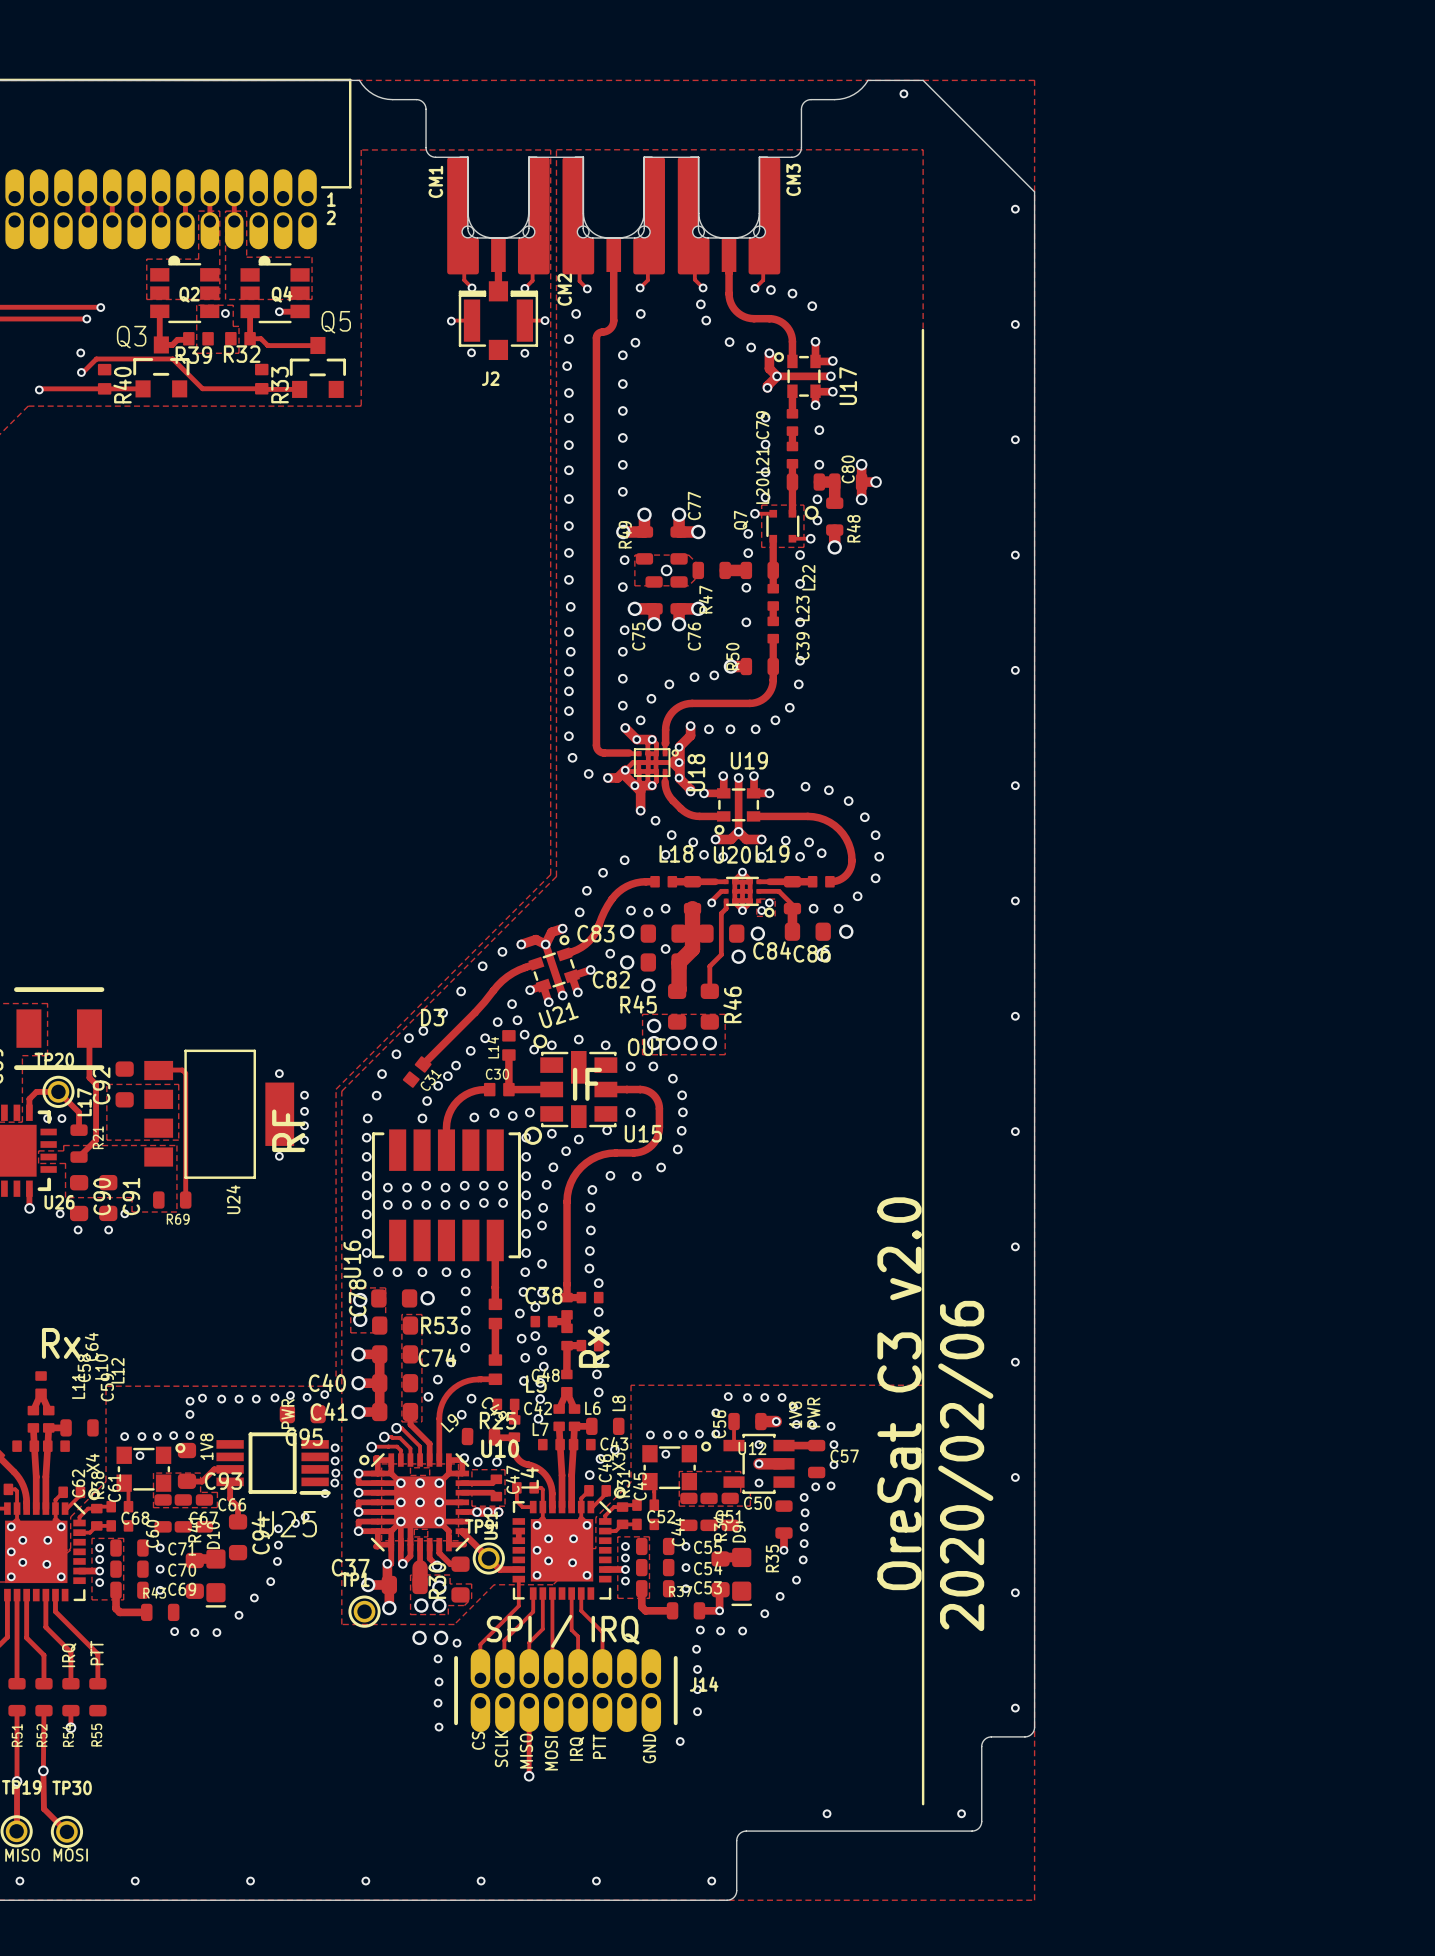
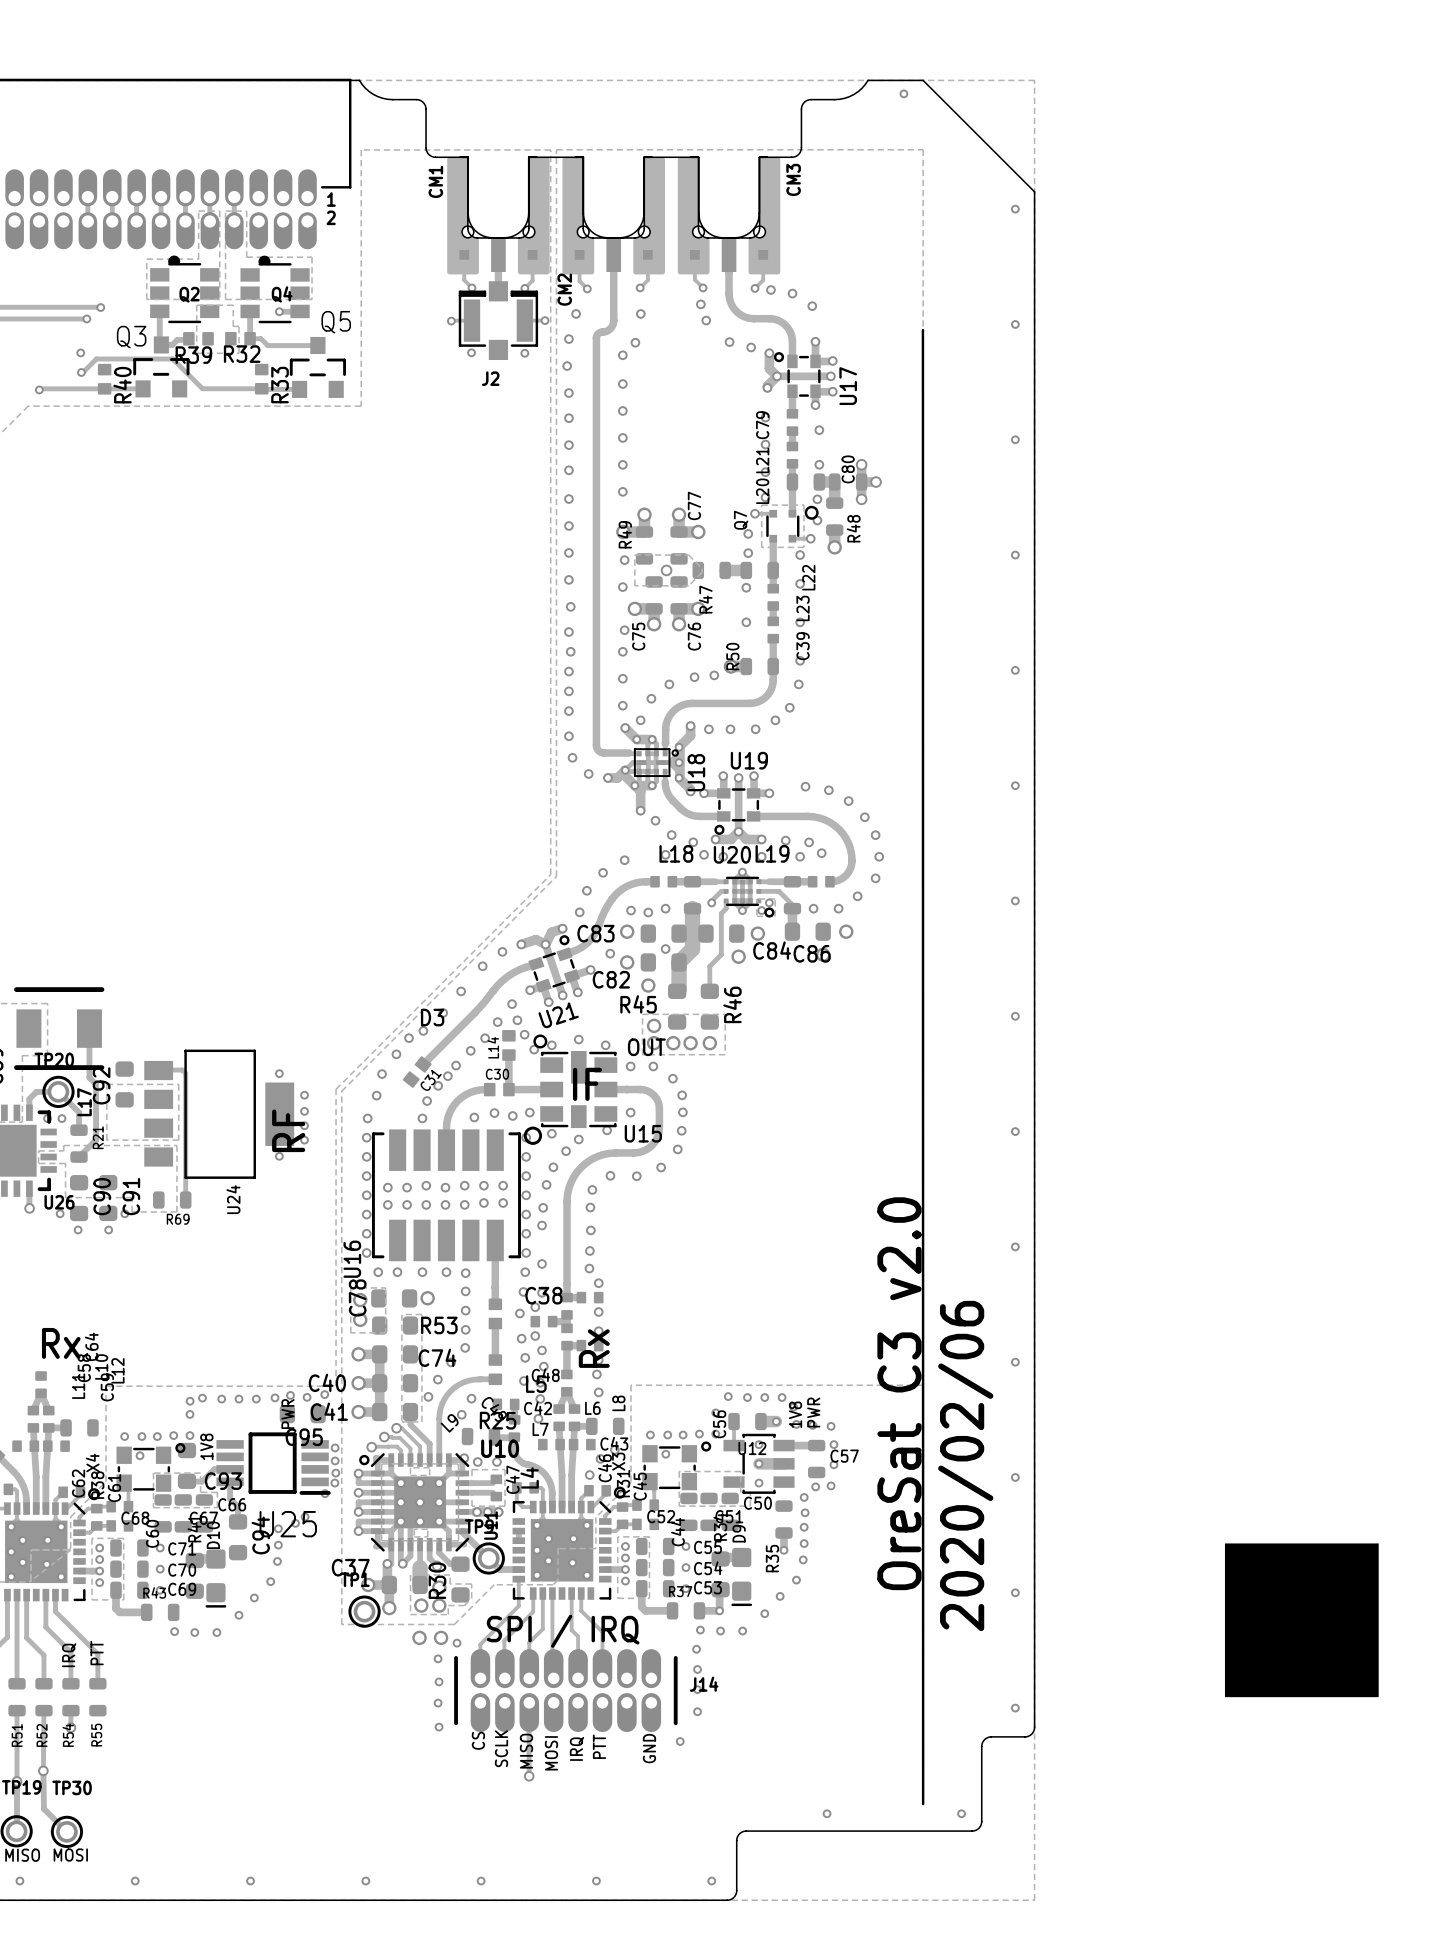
via: (225, 313) -> none
drawing: none -> [1224, 1543, 1379, 1698]

